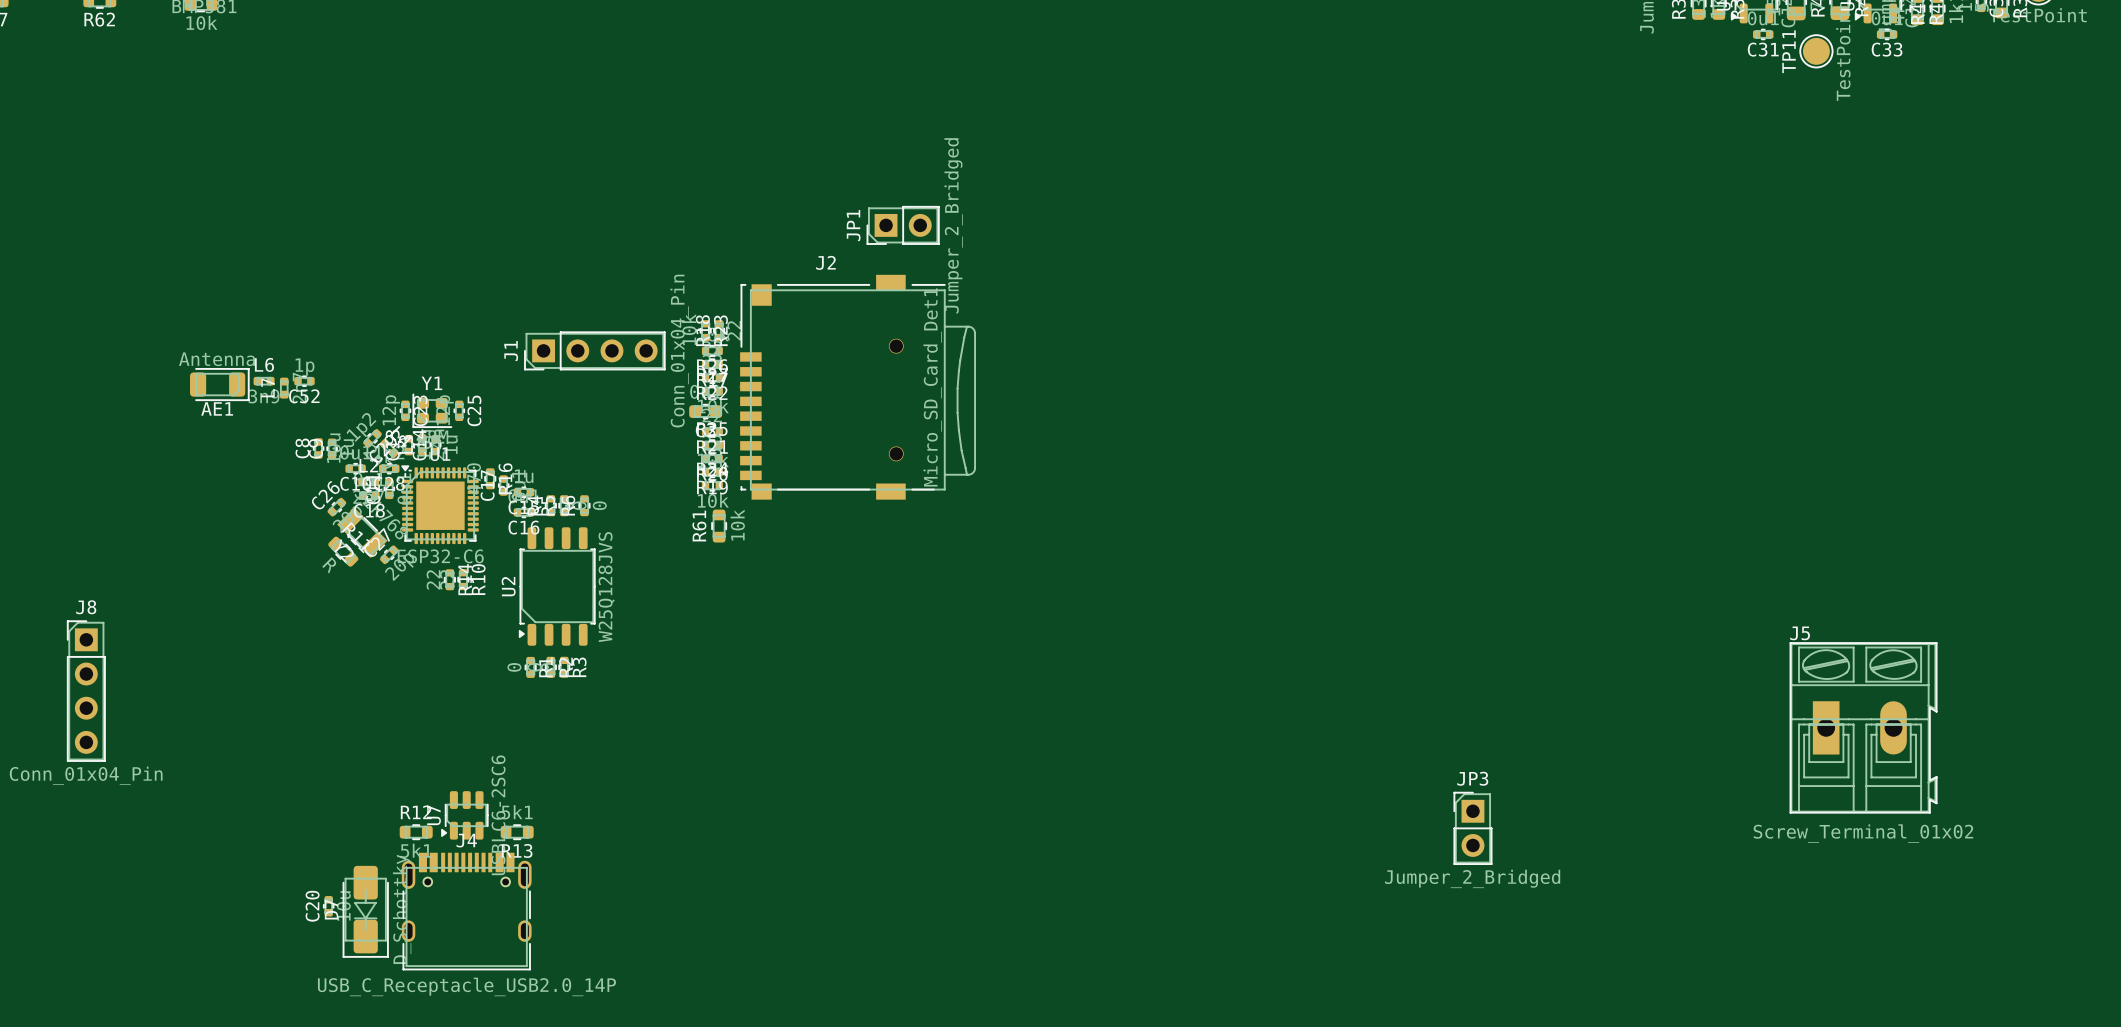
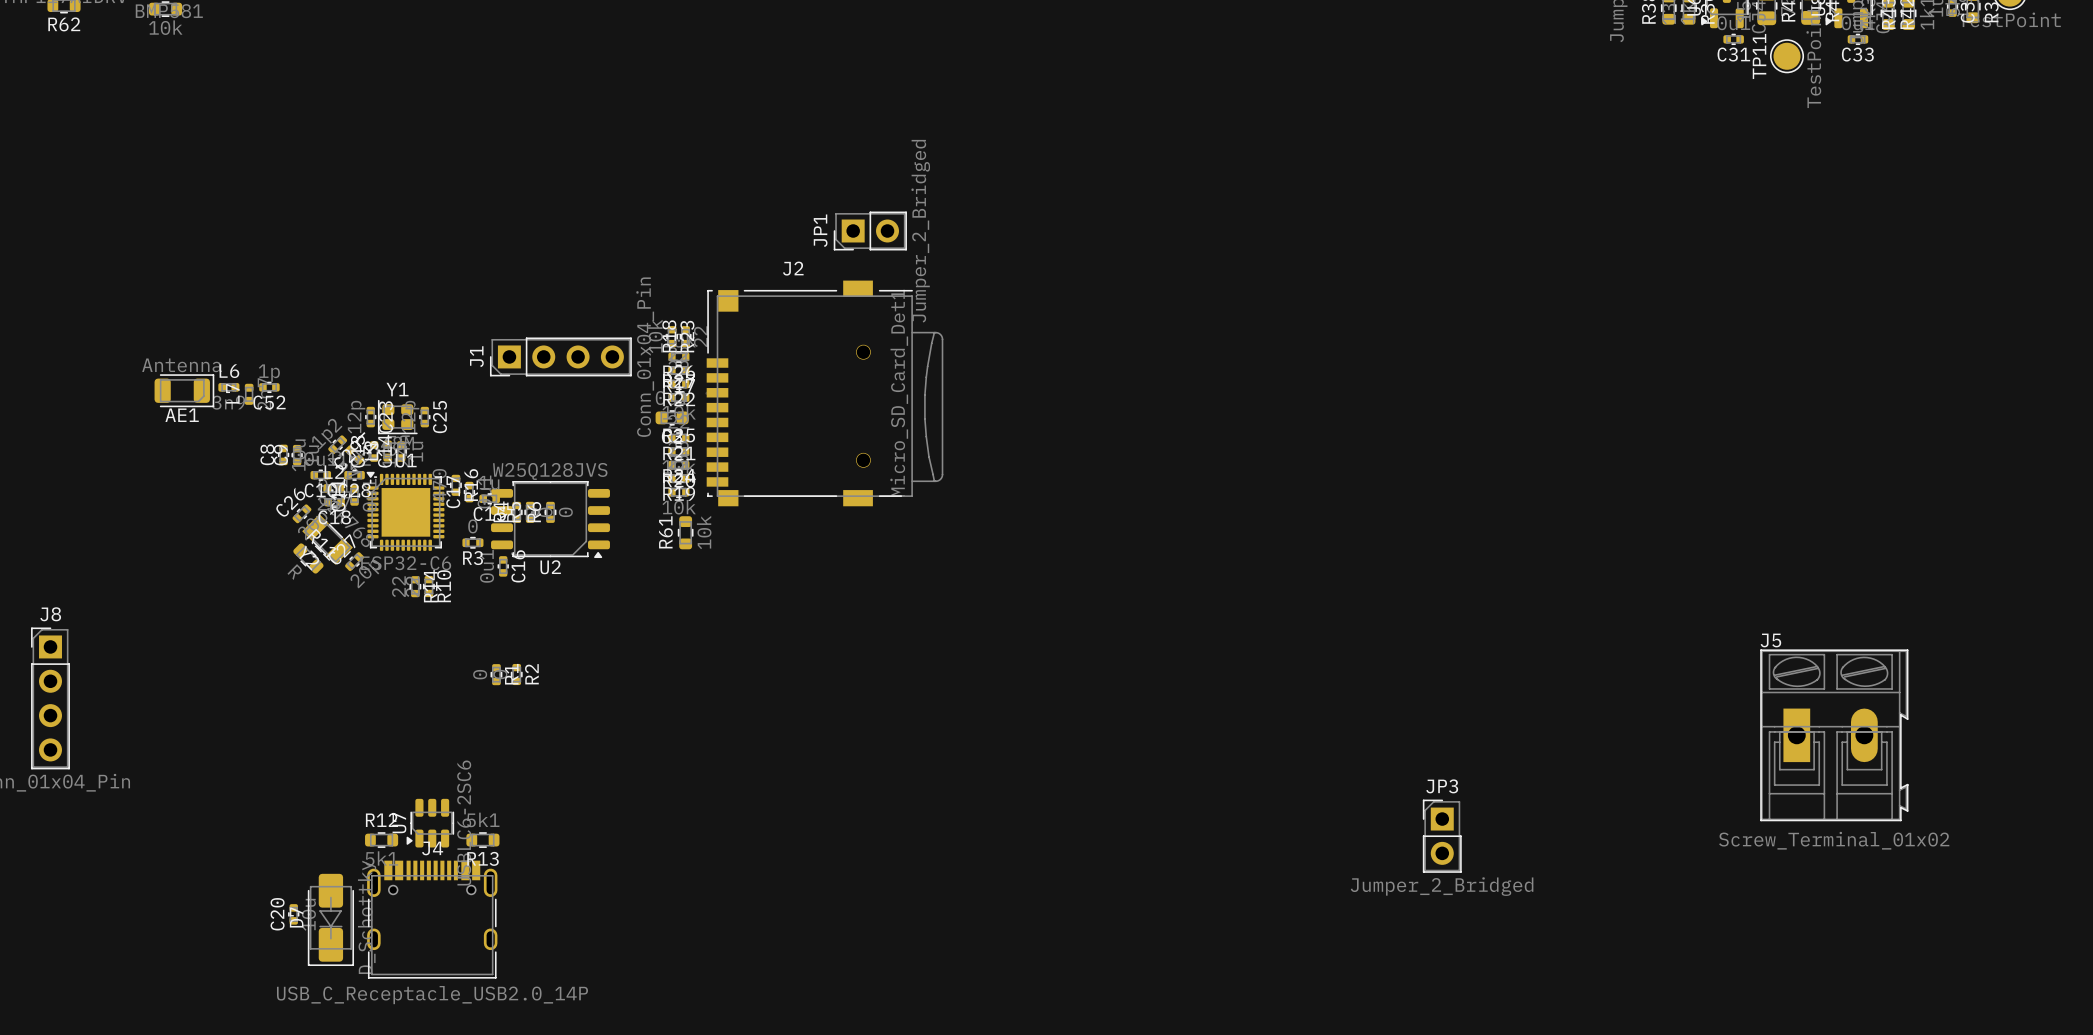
C16 rotation: 0° (523, 512) -> 90° clockwise (503, 566)
C16 position: (523, 512) -> (503, 566)
U2 rotation: 0° (557, 586) -> 90° counterclockwise (550, 519)
U2 position: (557, 586) -> (550, 519)
R3 rotation: 0° (564, 667) -> 90° clockwise (472, 542)
R3 position: (564, 667) -> (472, 542)

